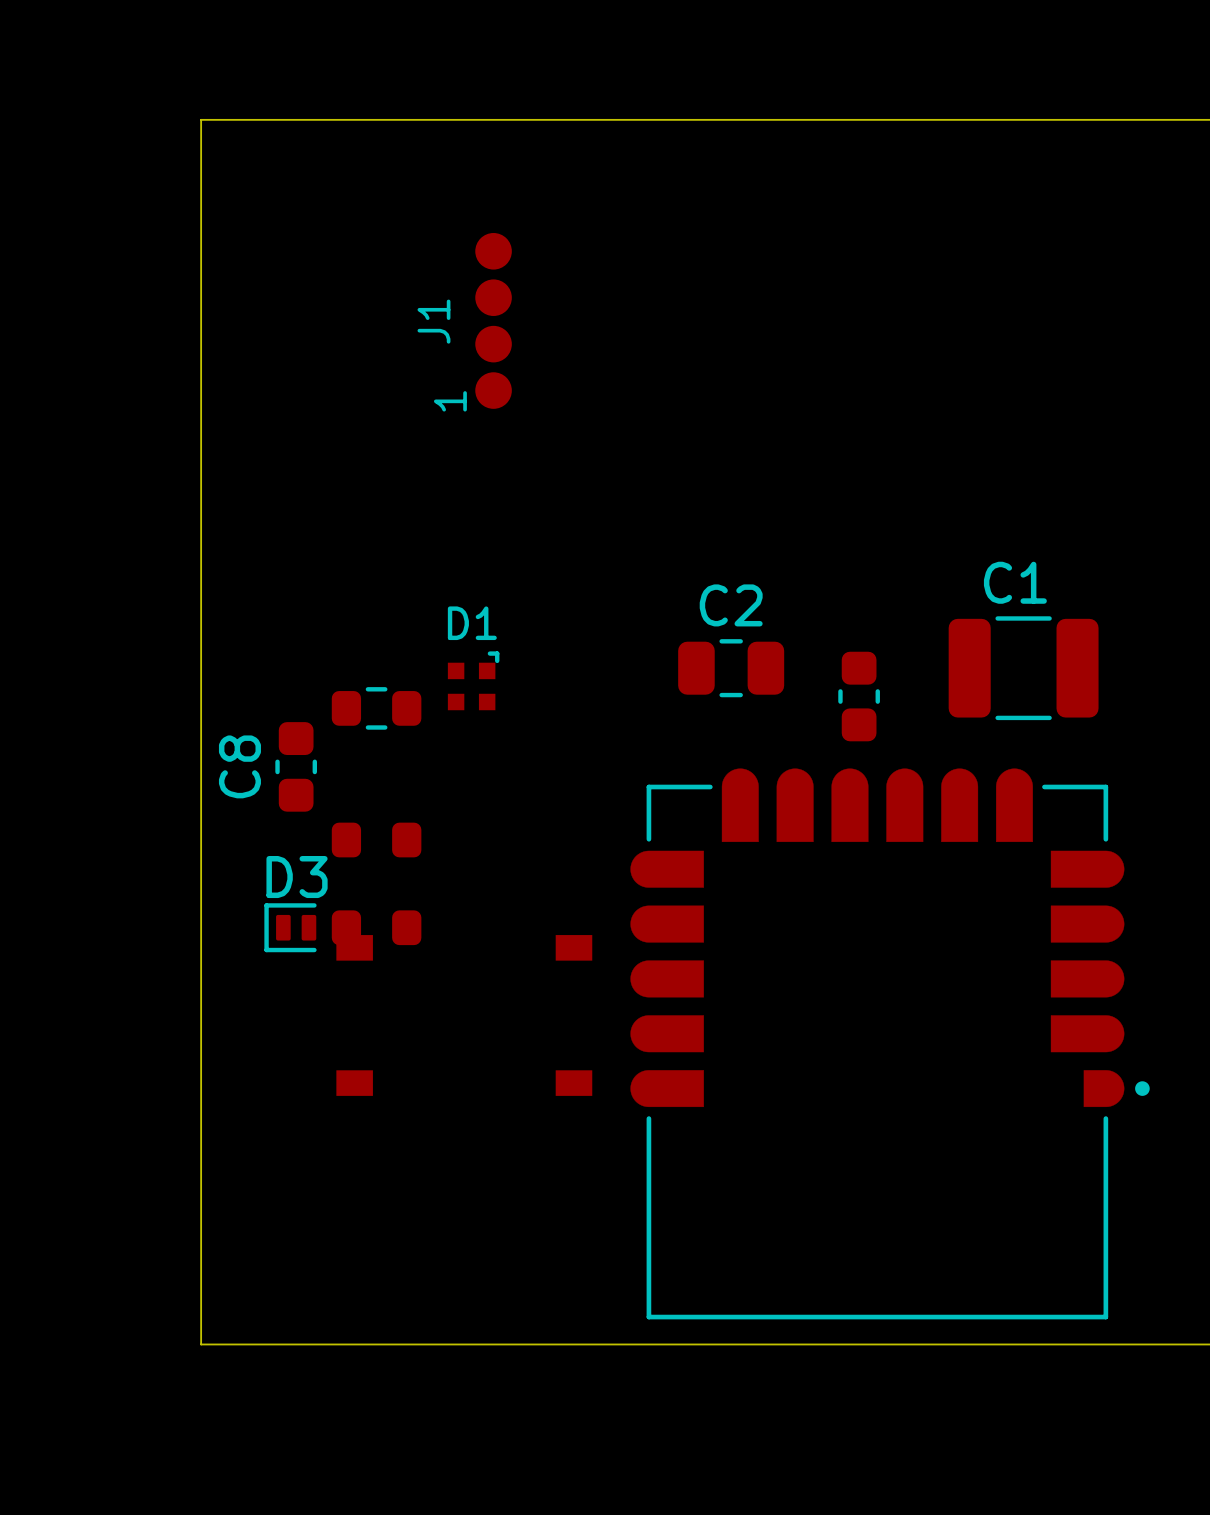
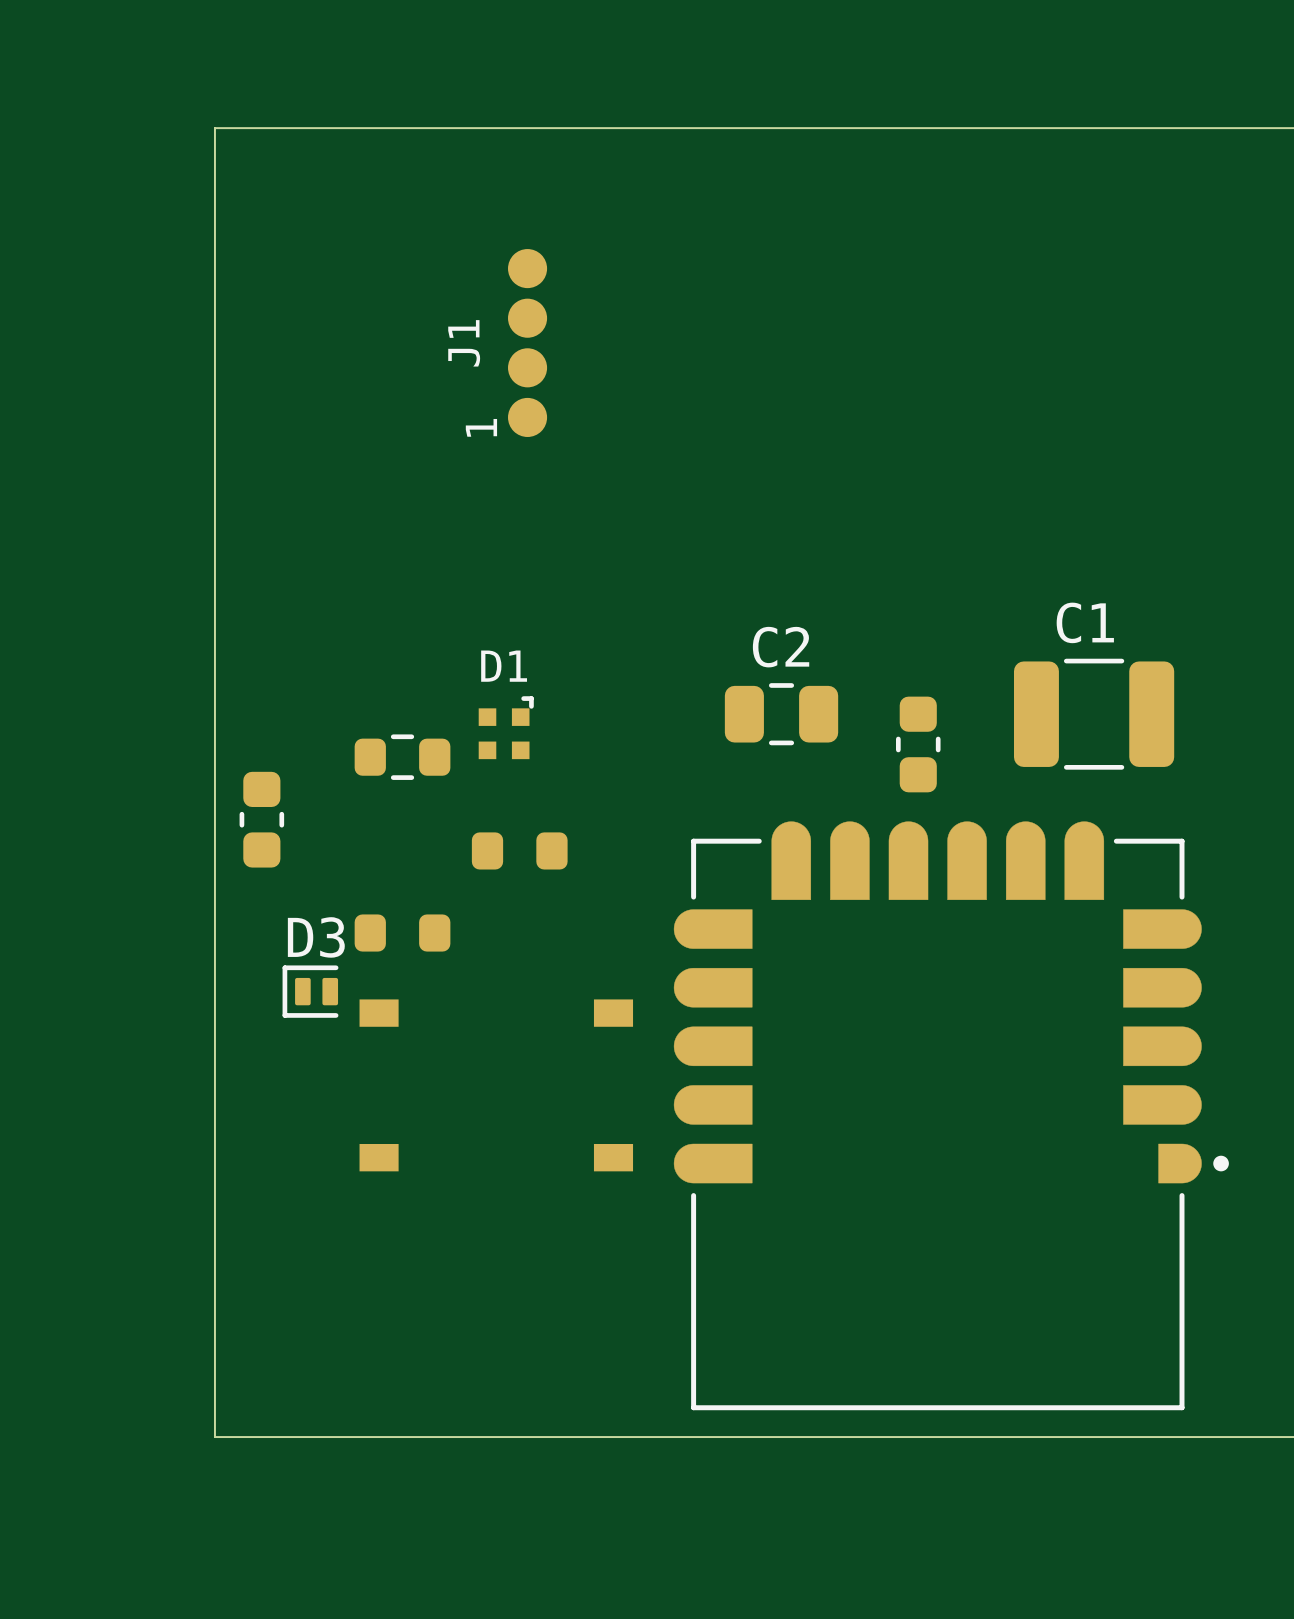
part: none -> (261, 819)
C8: (296, 766) -> none
part: none -> (519, 850)
part: (376, 840) -> none
part: none -> (402, 933)
part: (376, 927) -> none

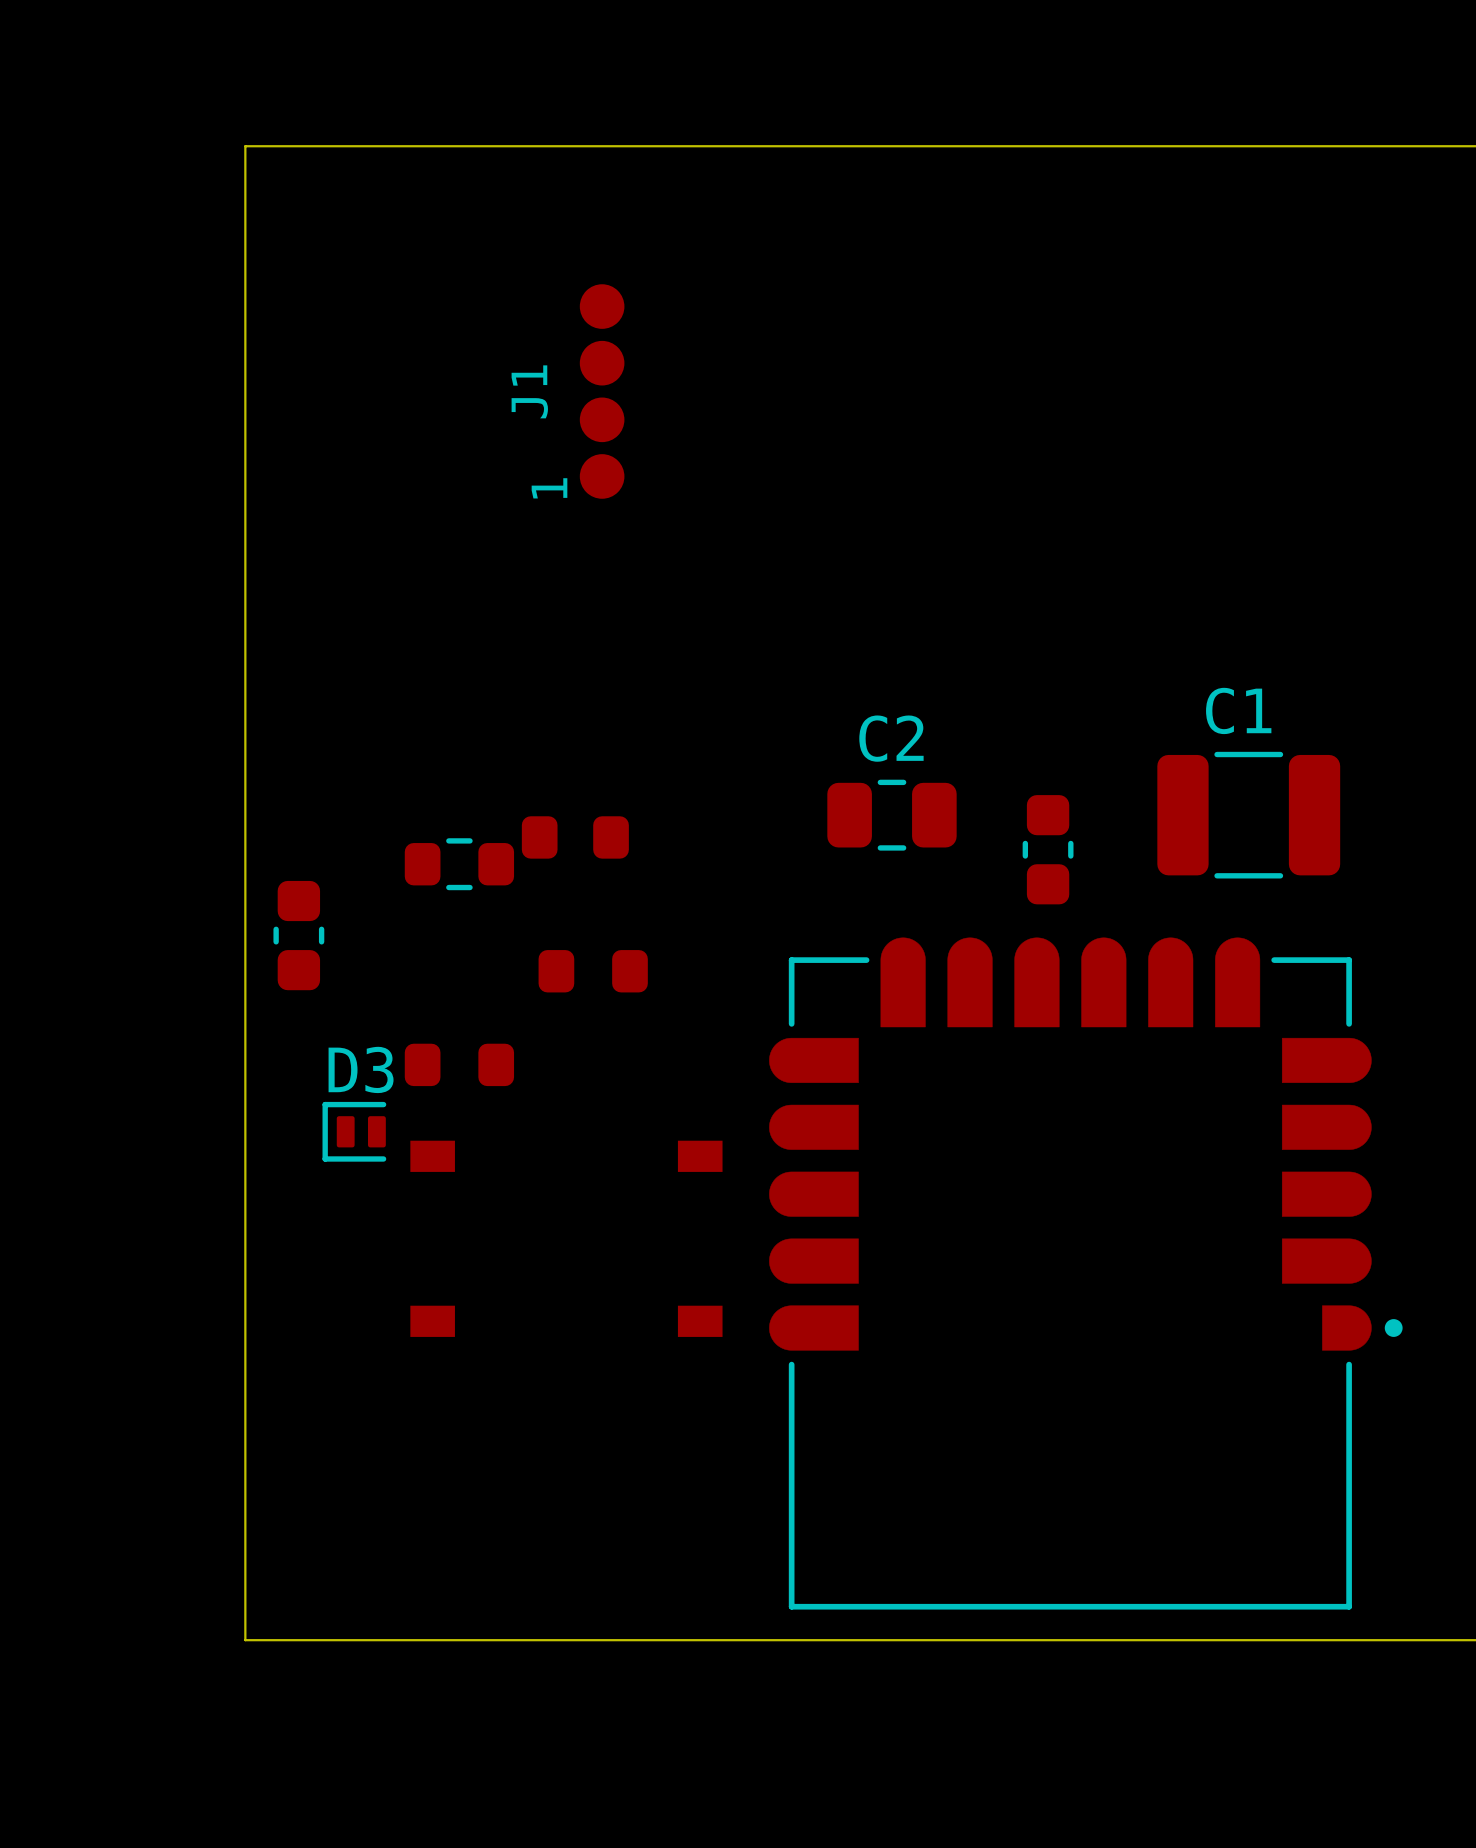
D1: (506, 727) -> none
part: none -> (575, 837)

